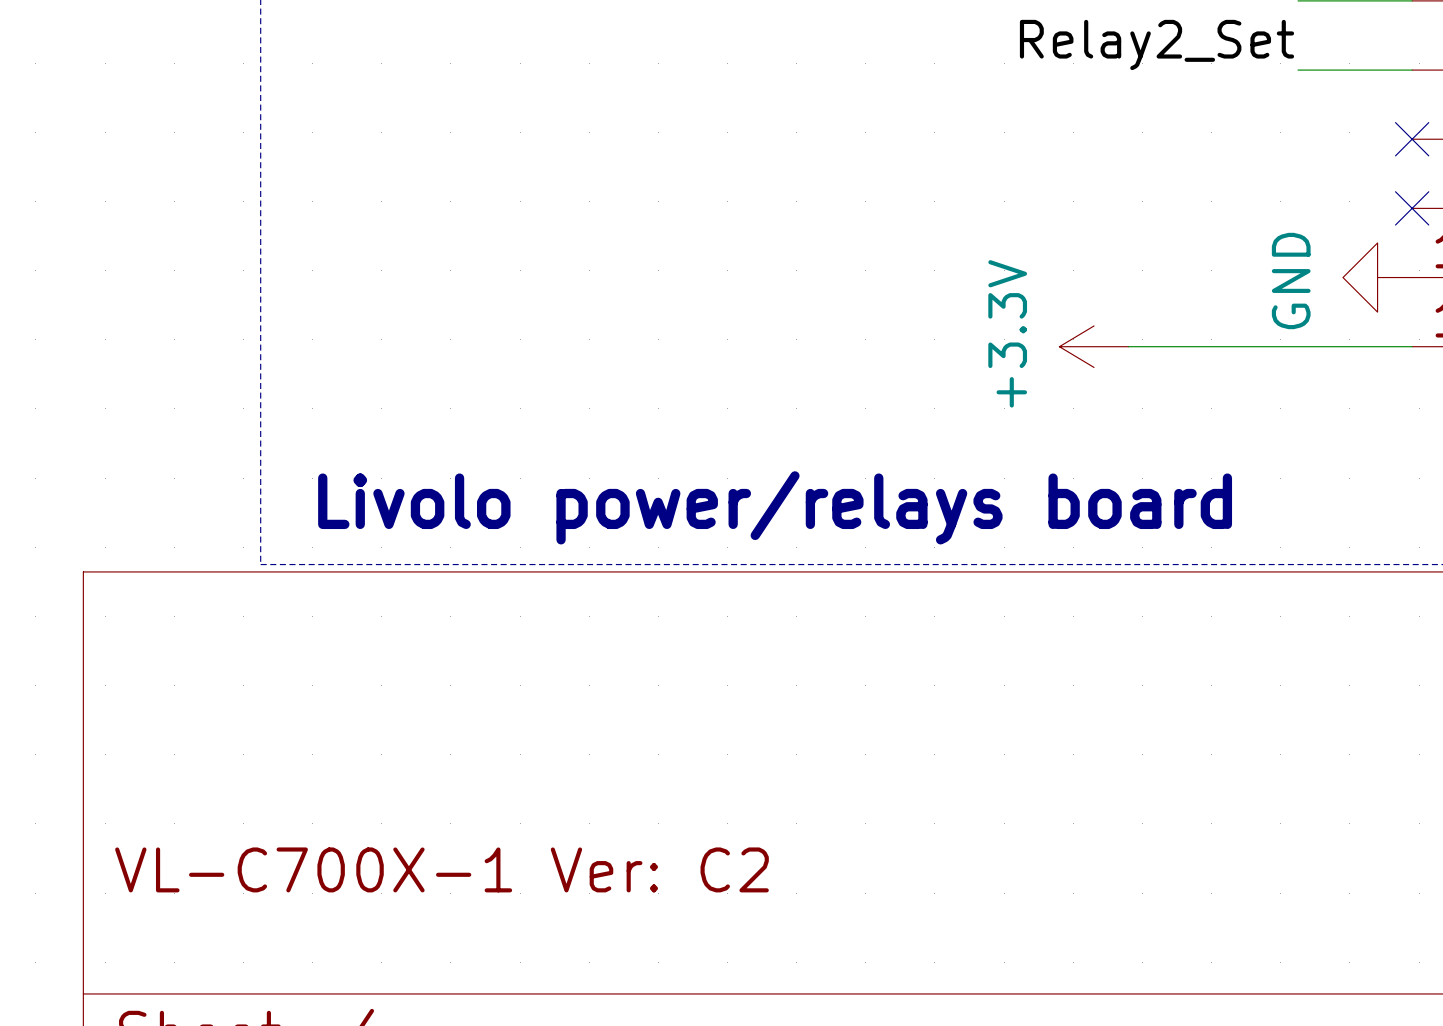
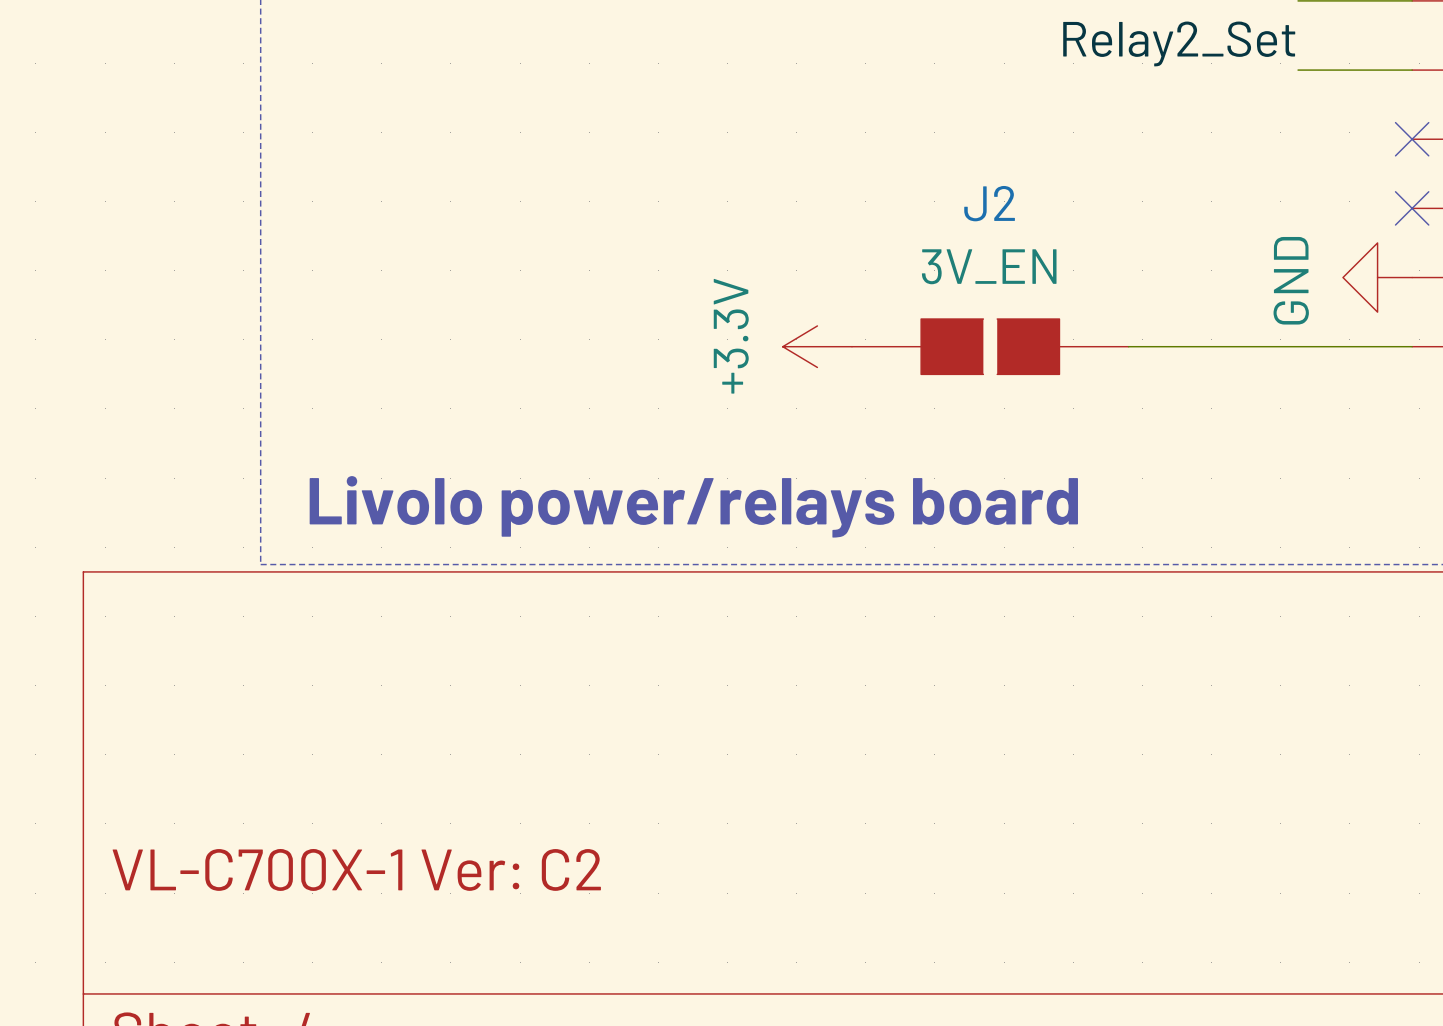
J2: none -> 3V_EN (990, 346)
power symbol position: +3.3V (1094, 346) -> +3.3V (817, 346)

